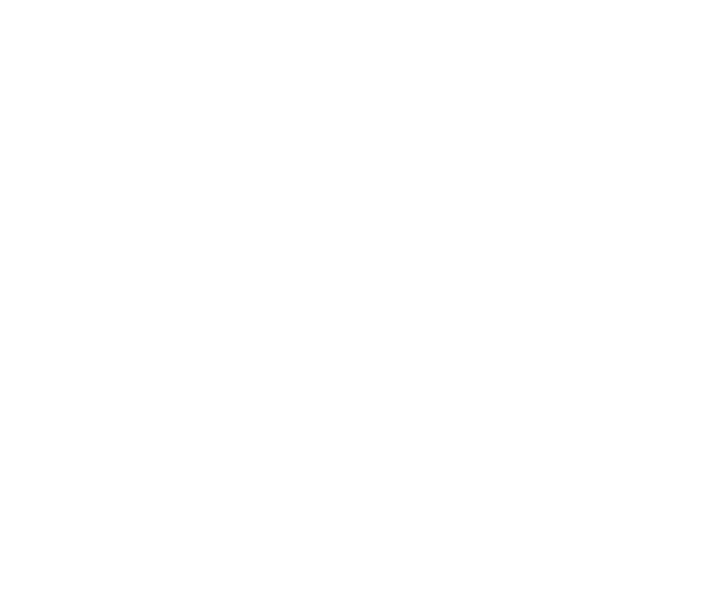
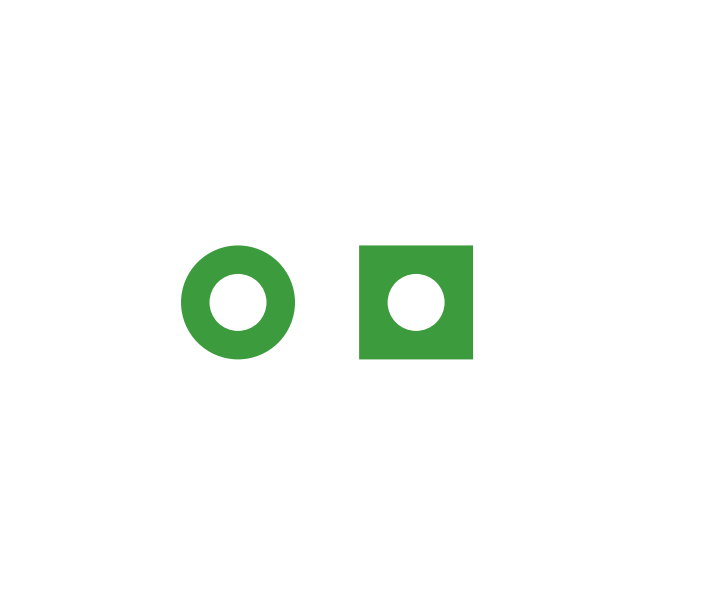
part: none -> (327, 302)

